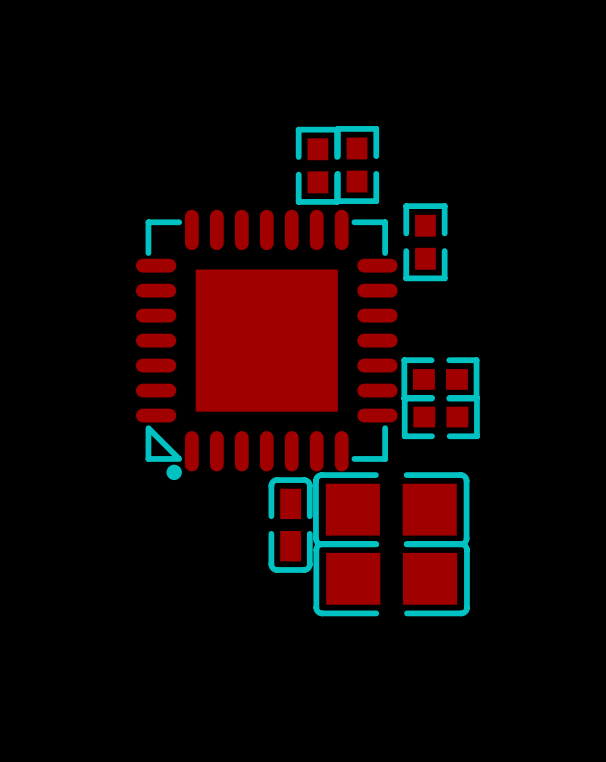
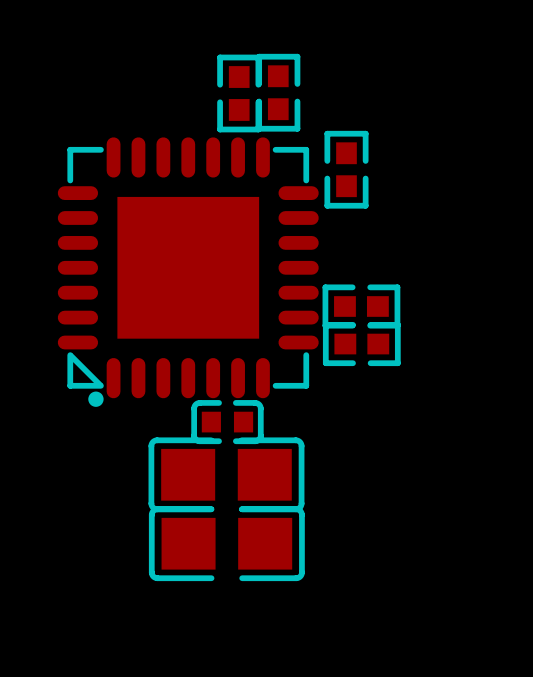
part: none -> (227, 422)
part: (391, 509) -> none
part: (290, 525) -> none
part: none -> (226, 474)
part: (391, 578) -> none
part: none -> (226, 543)

